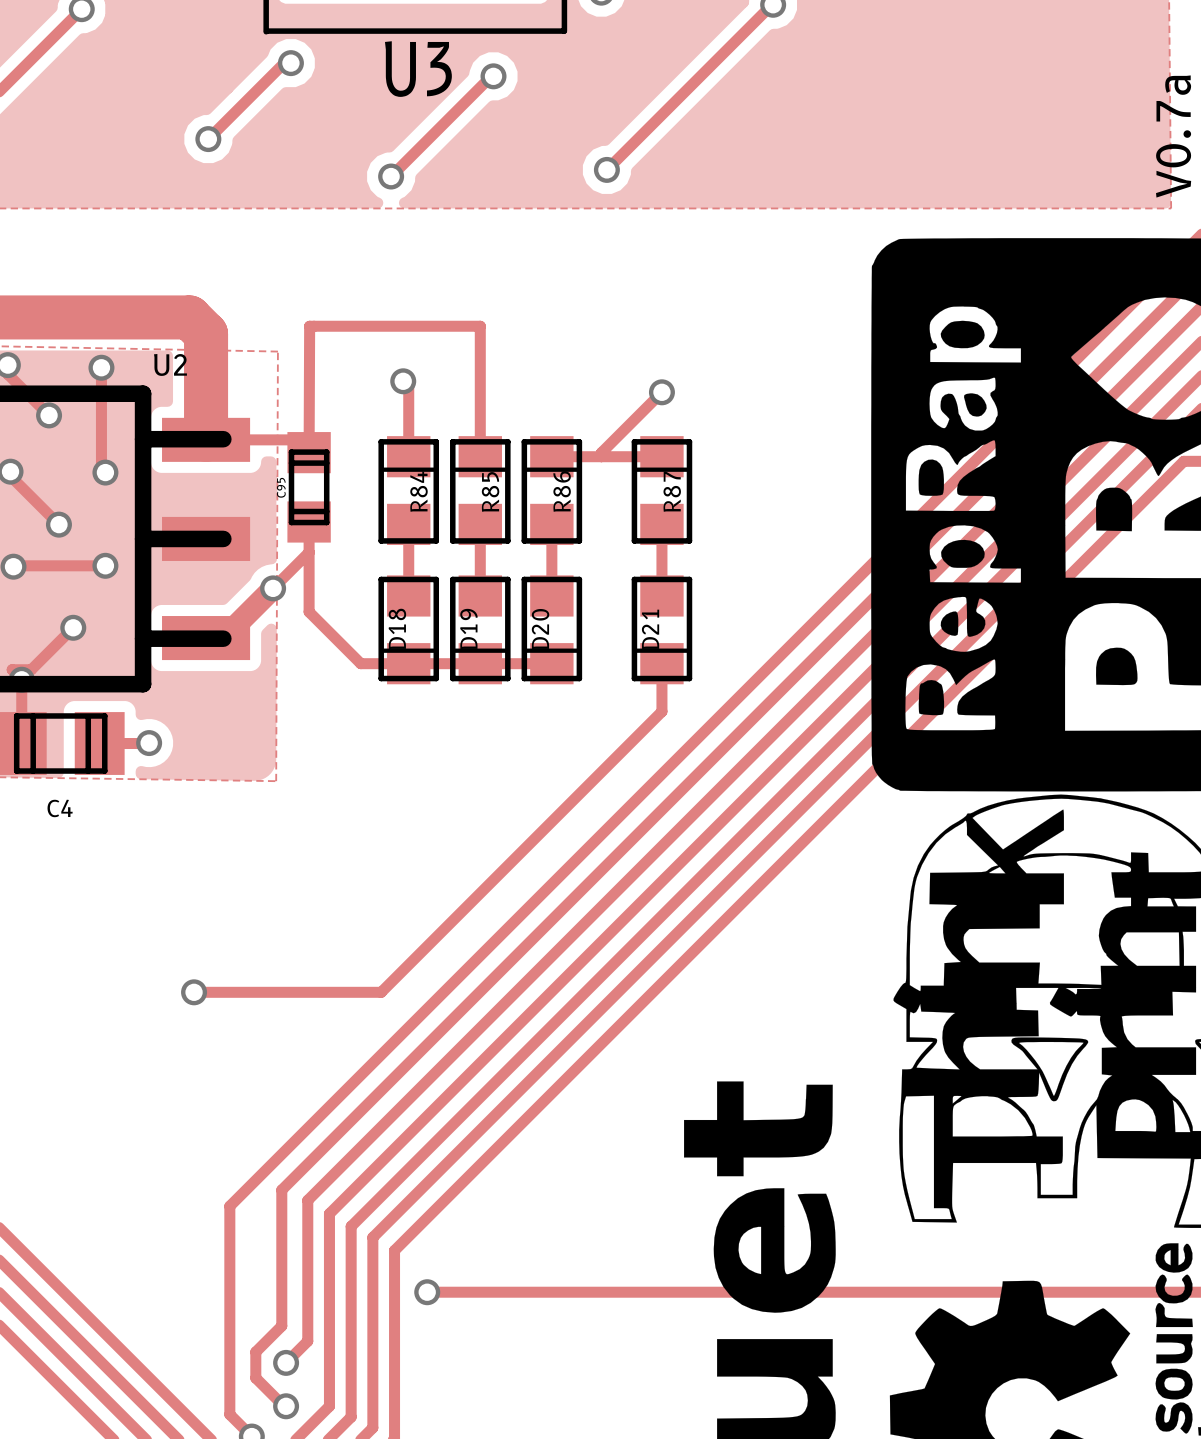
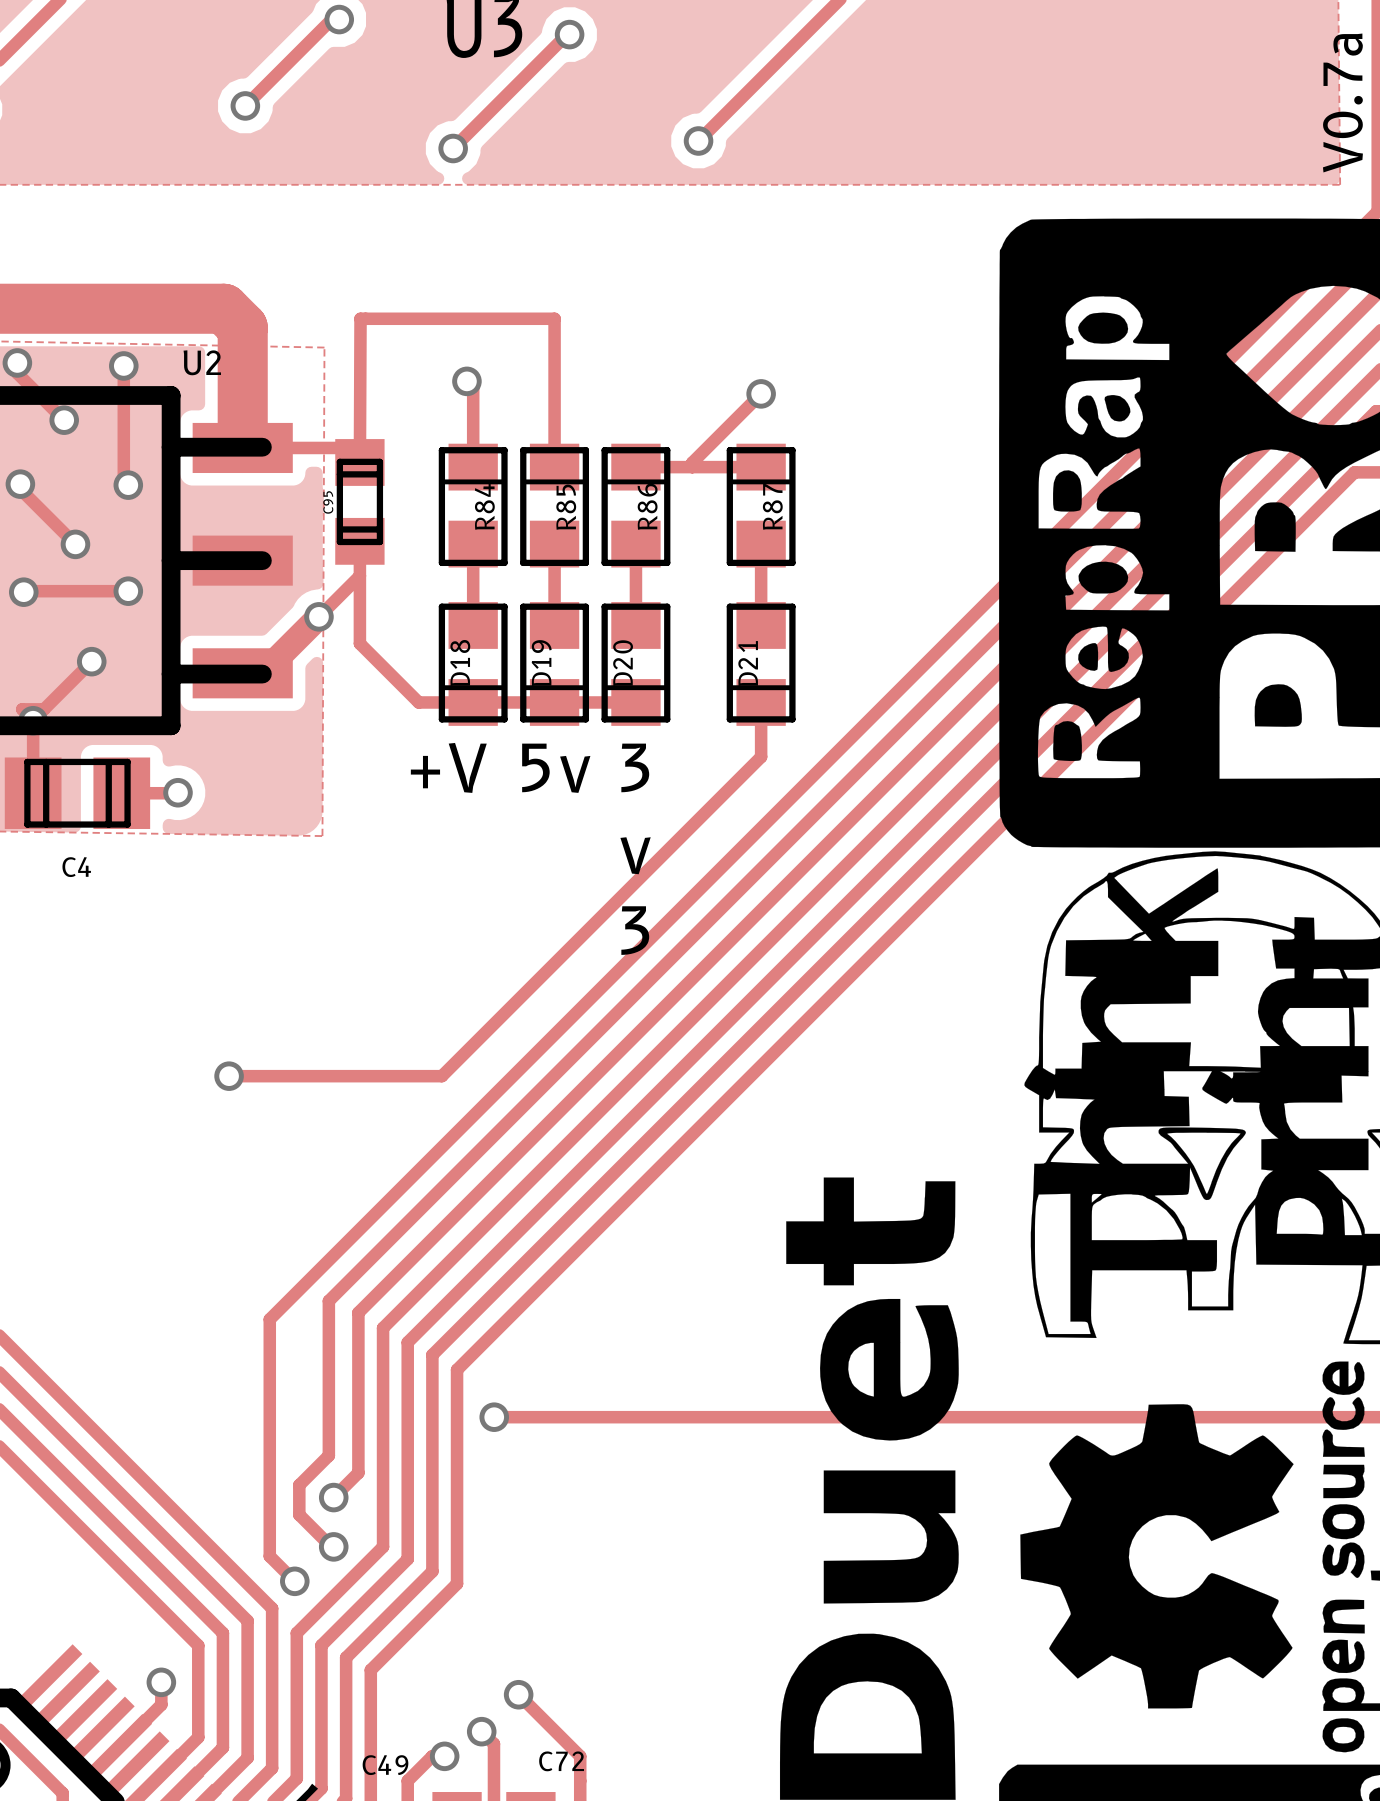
text: none -> +V (448, 767)
text: none -> 5v (556, 768)
text: none -> 3 (635, 767)
text: none -> v (635, 855)
text: none -> 3 (635, 930)

